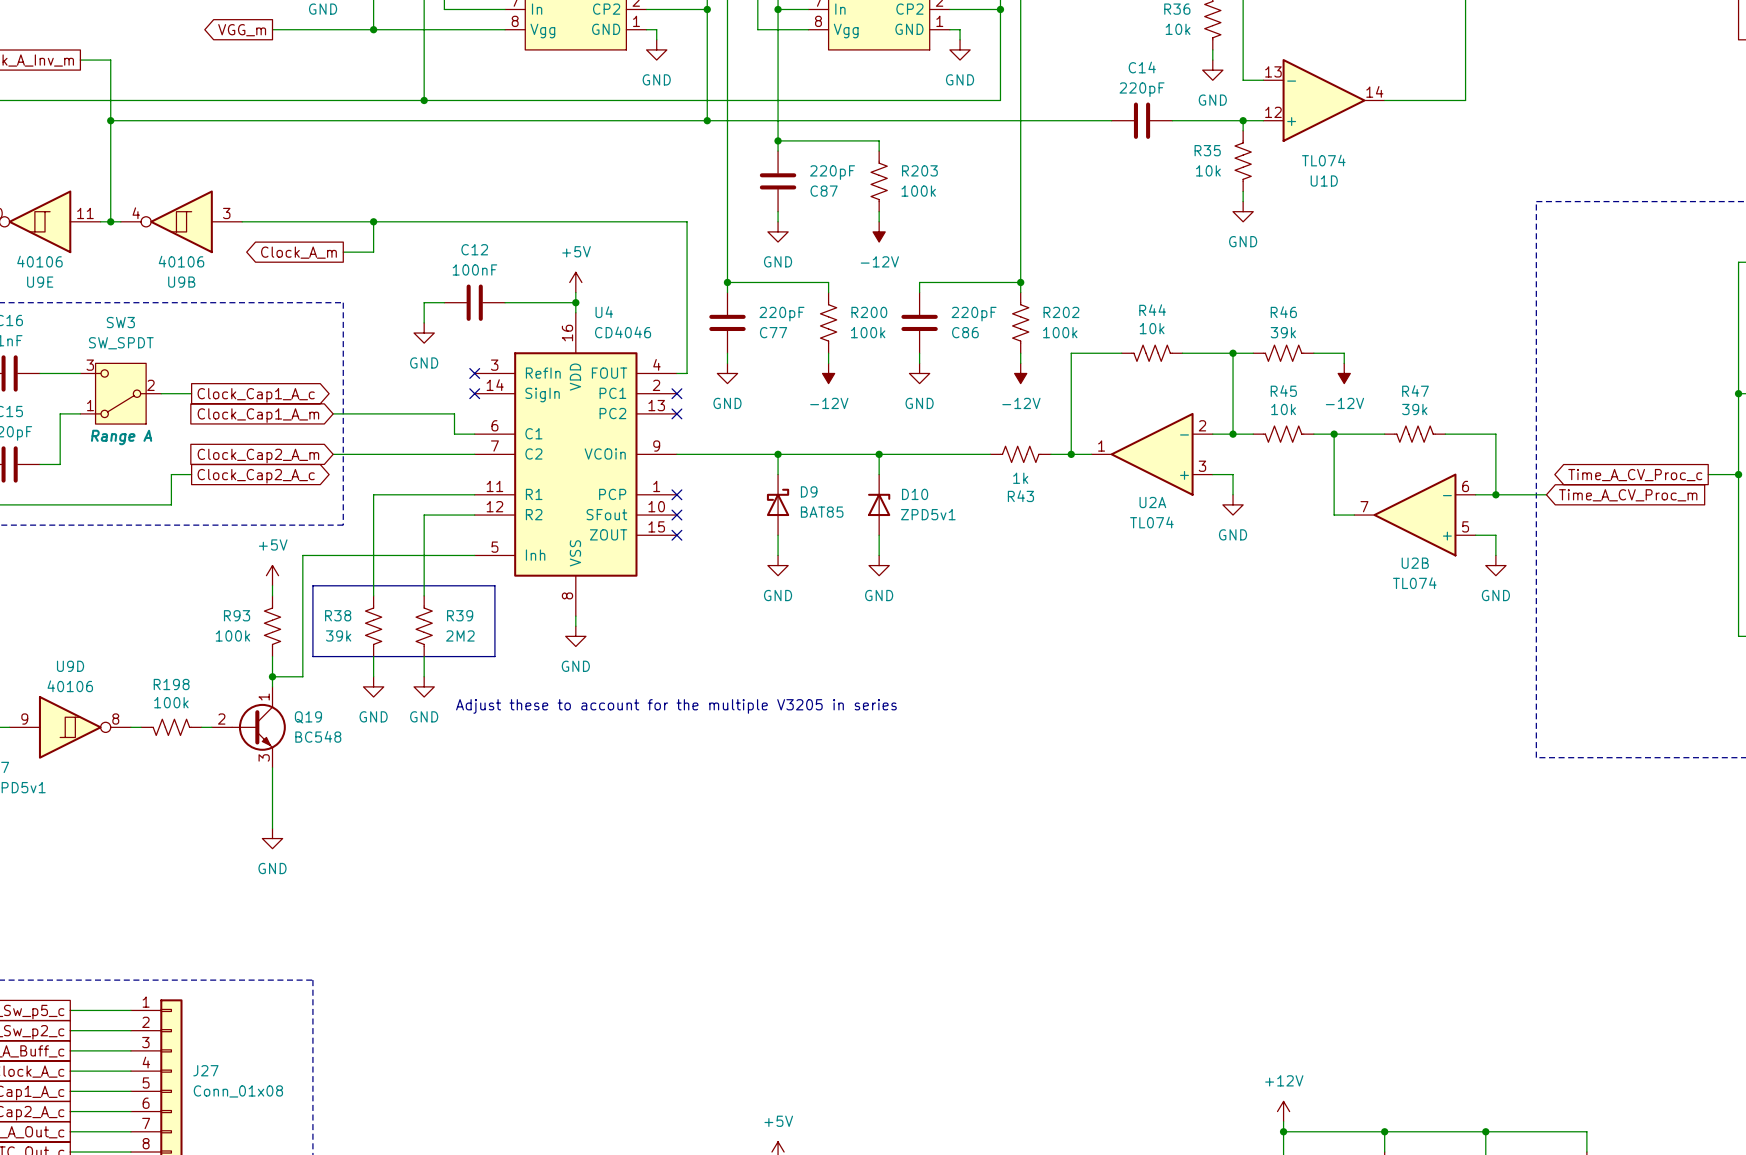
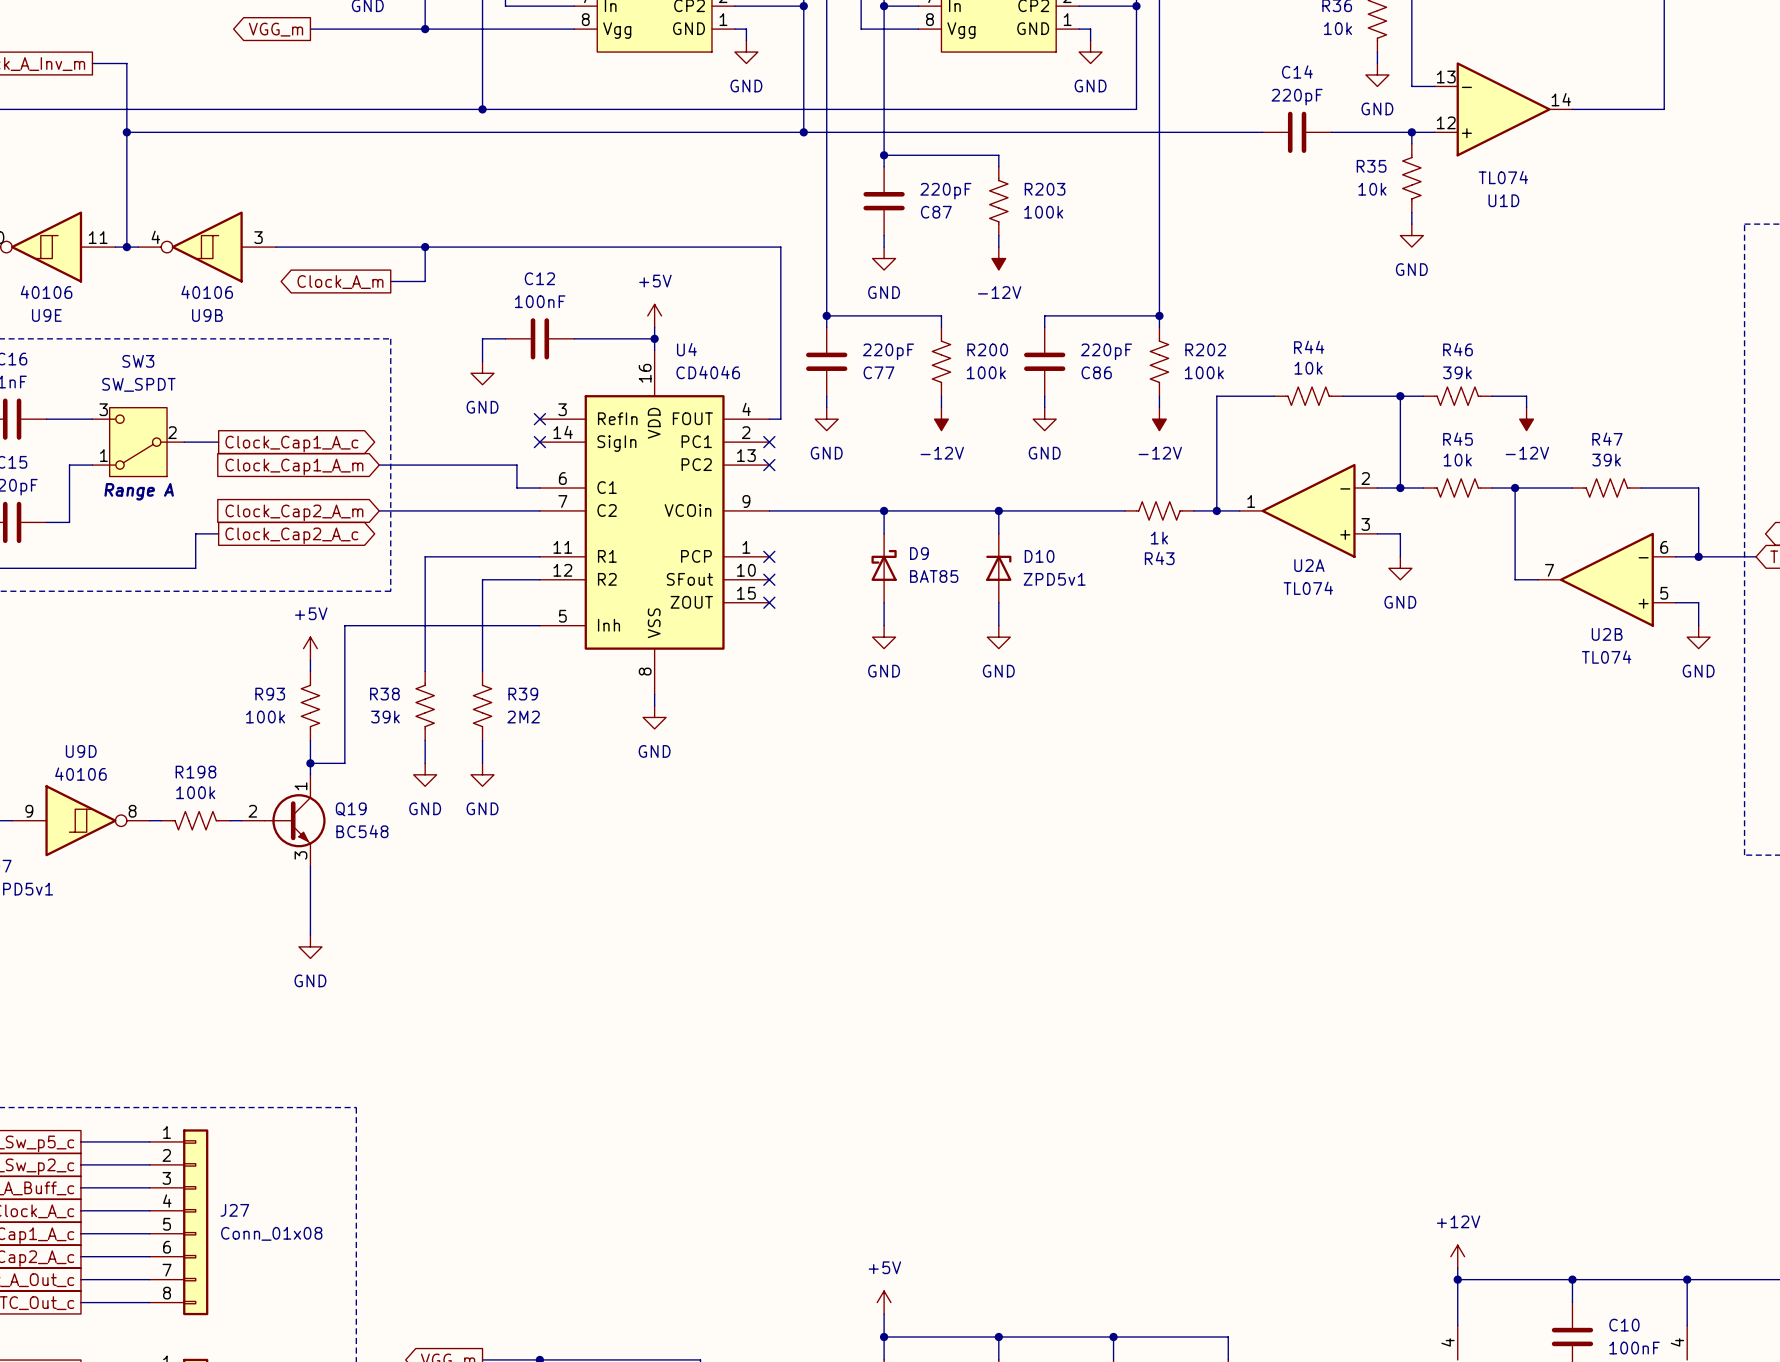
line: (312, 585) (494, 585) (494, 656) (312, 656) (312, 585) -> none
text: Adjust these to account for the multiple V3205 in series (676, 706) -> none

